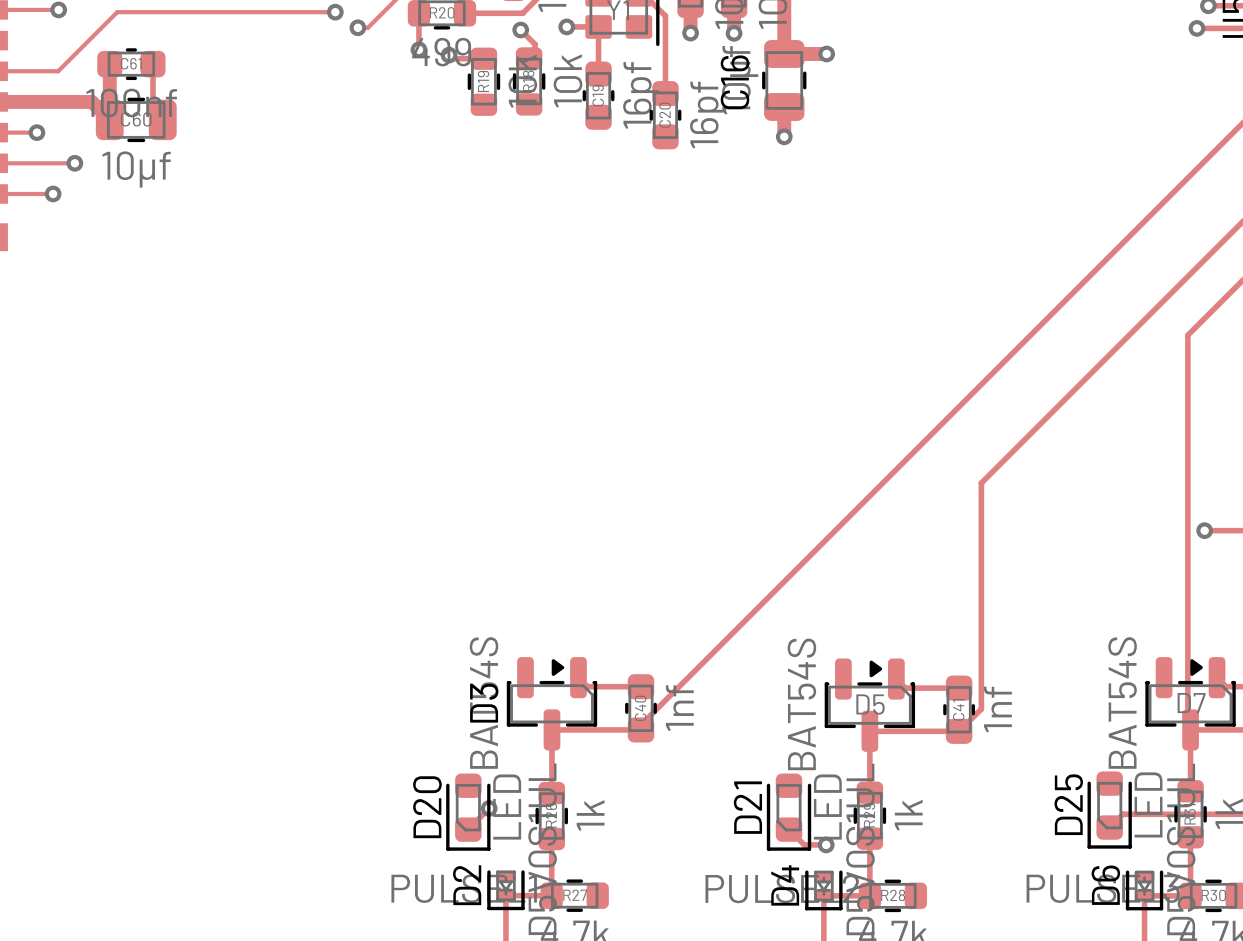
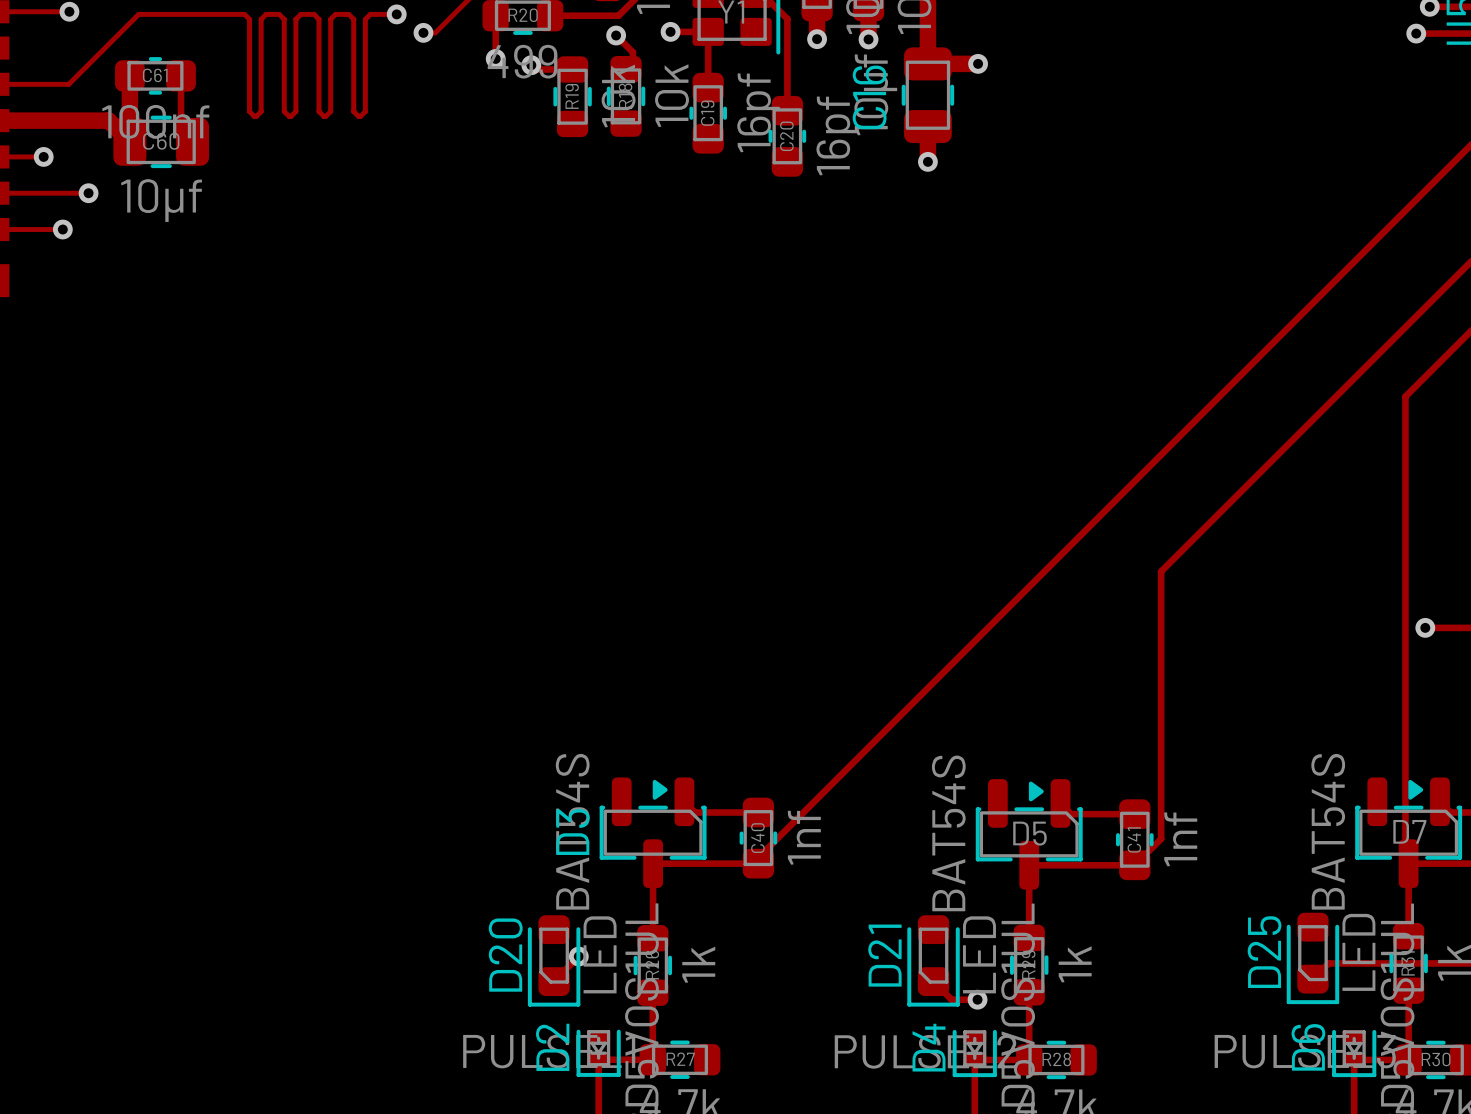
track: (206, 12) (224, 12) -> (244, 14) (249, 19) (249, 111) (254, 116) (261, 111) (261, 19) (266, 14)
track: (236, 12) (254, 12) -> (279, 14) (284, 19) (284, 111) (289, 116) (295, 111) (295, 19) (300, 14)
track: (265, 12) (283, 12) -> (314, 14) (319, 19) (319, 111) (323, 116) (330, 111) (330, 19) (335, 14)
track: (294, 12) (313, 12) -> (348, 14) (353, 19) (353, 111) (358, 116) (365, 111) (365, 19) (370, 14)

